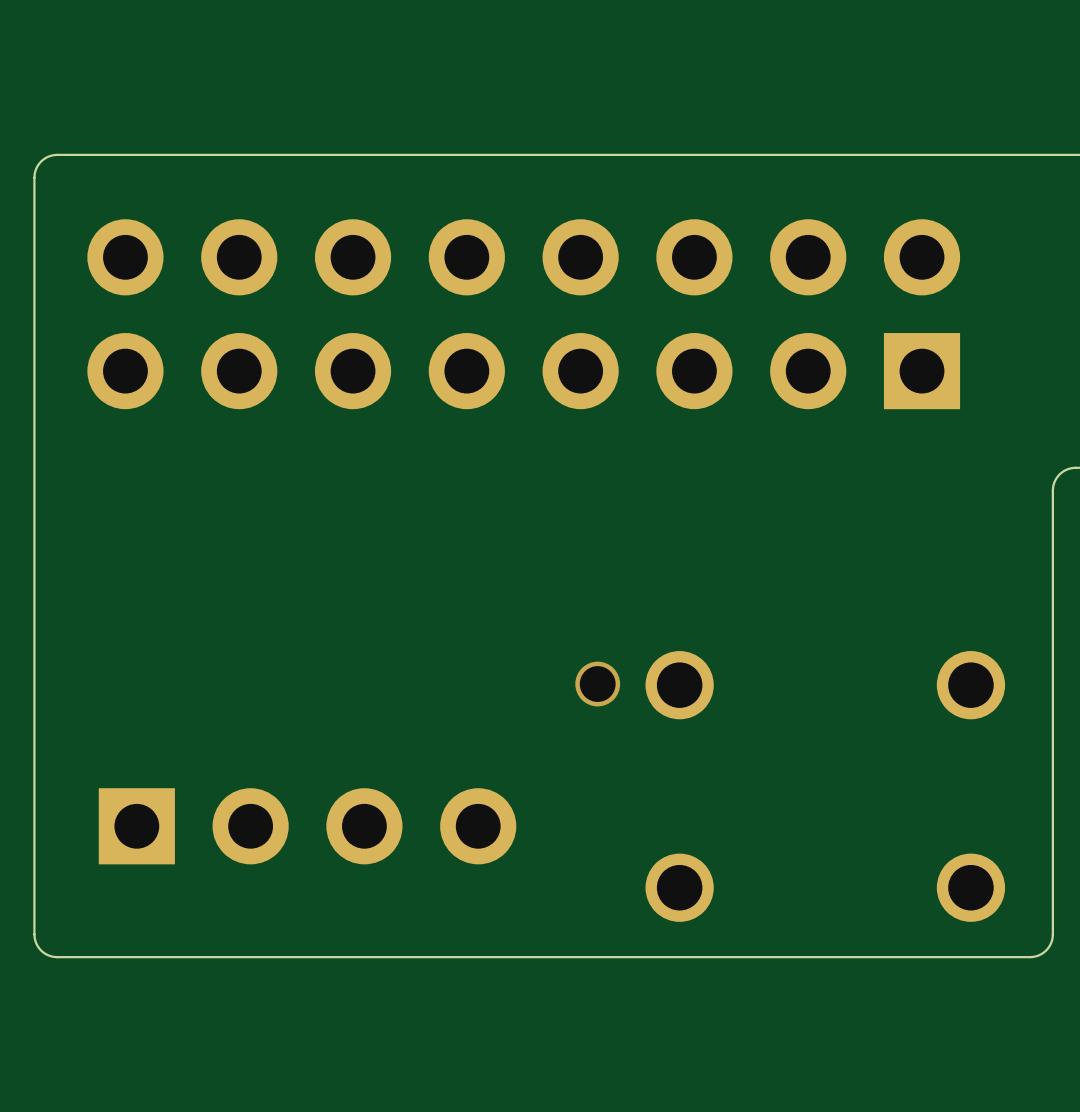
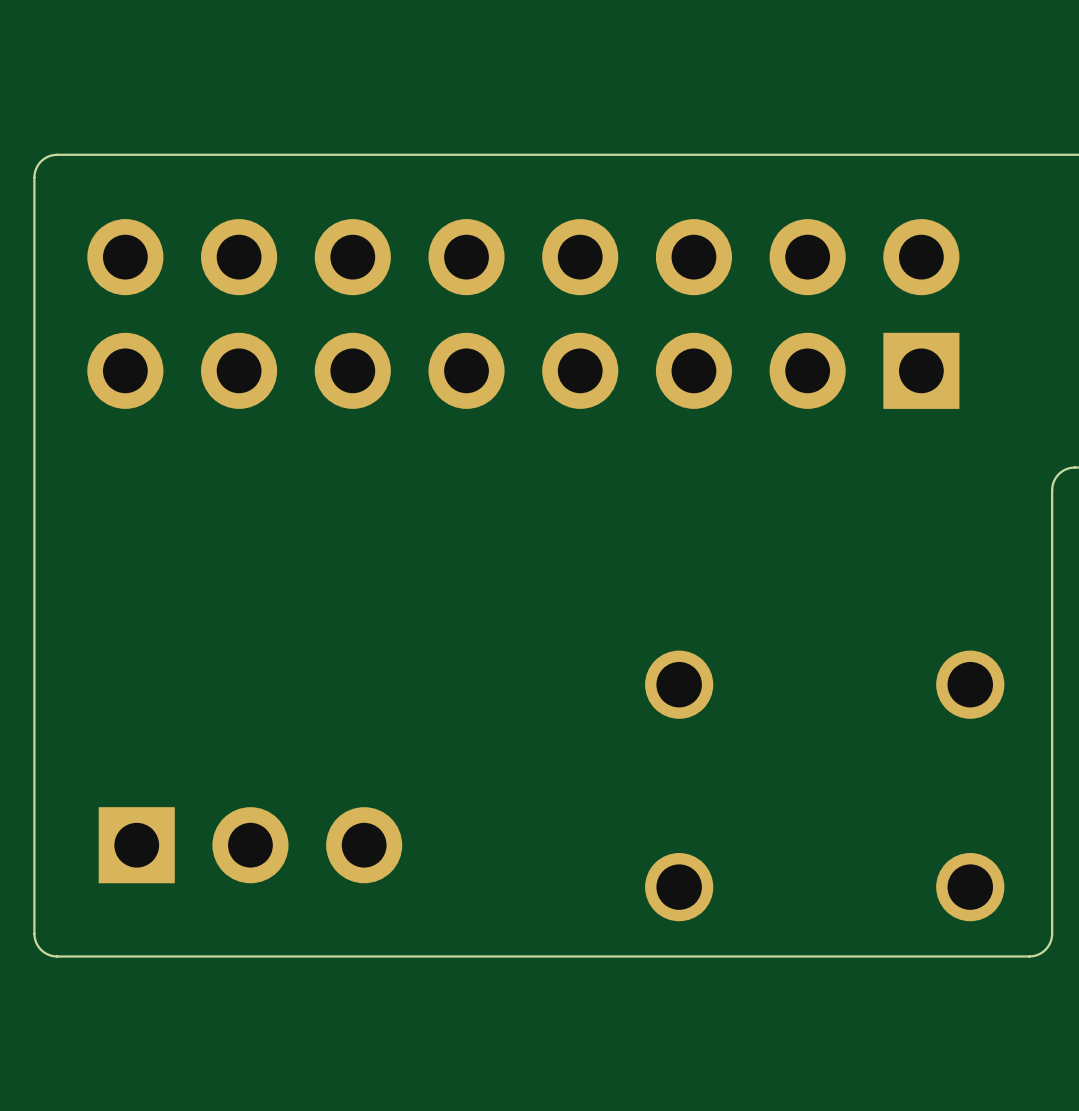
via: (597, 684) -> none
part: (307, 826) -> none
part: none -> (250, 845)

